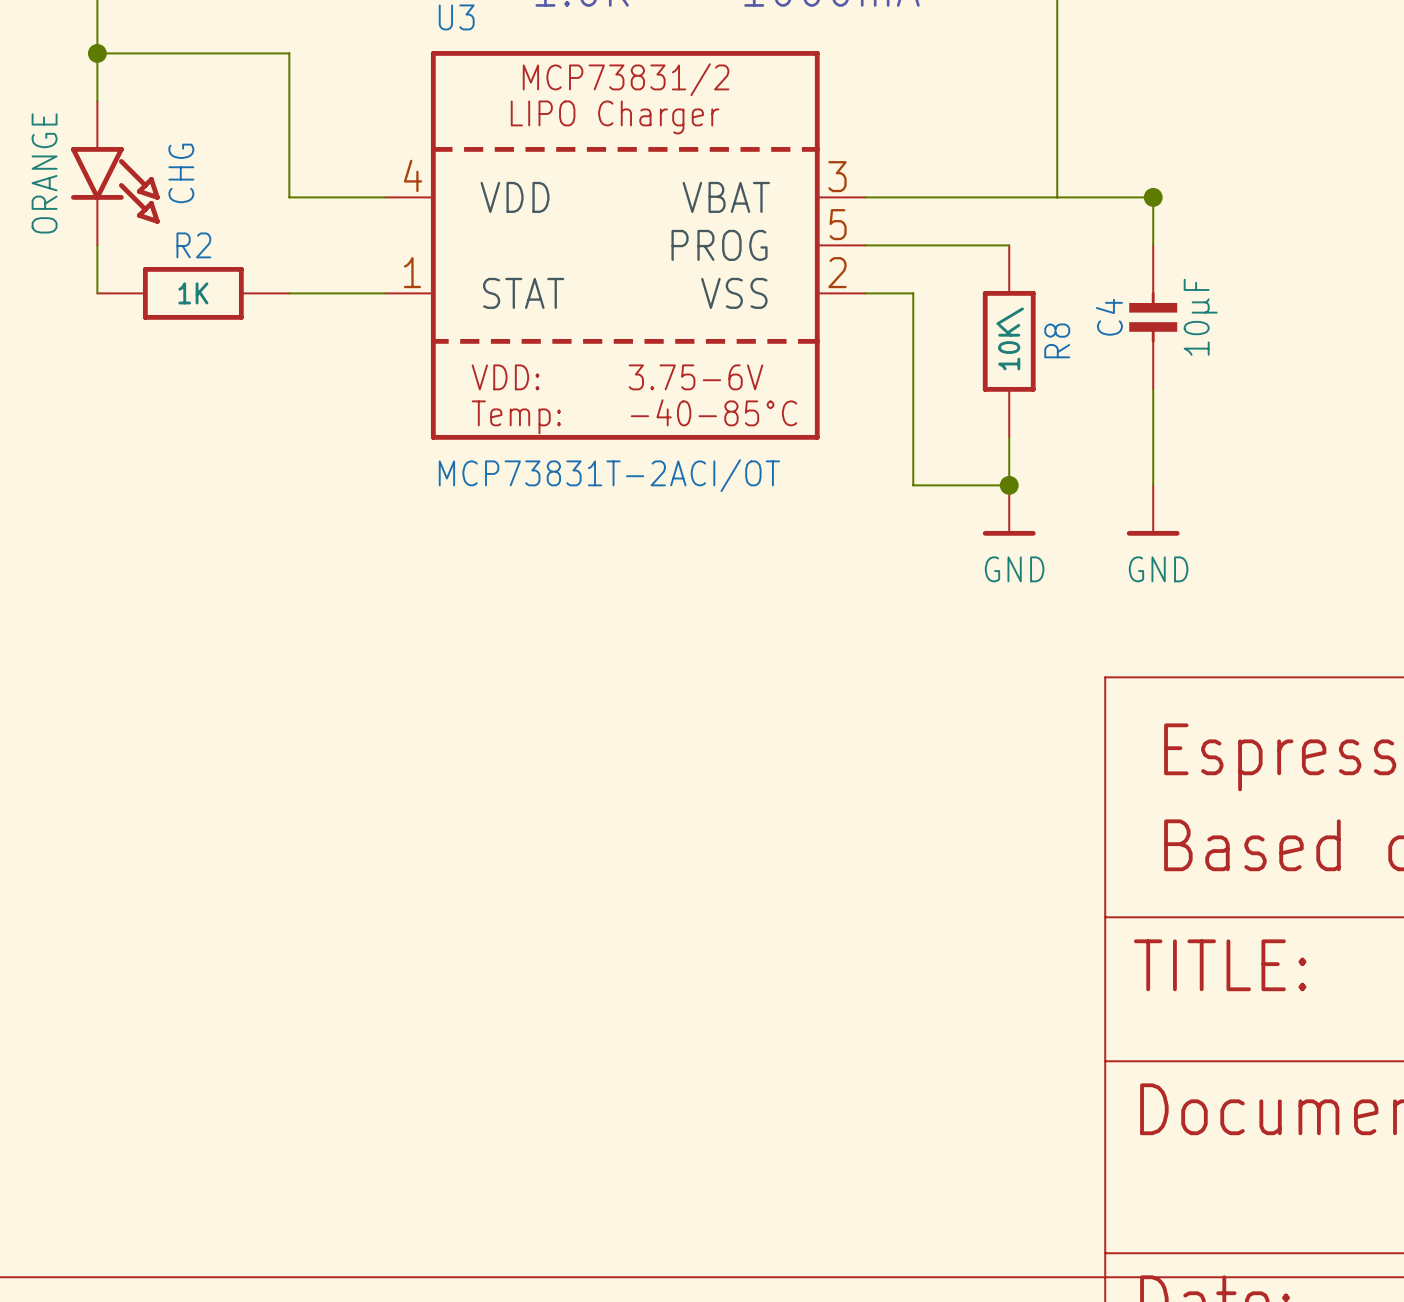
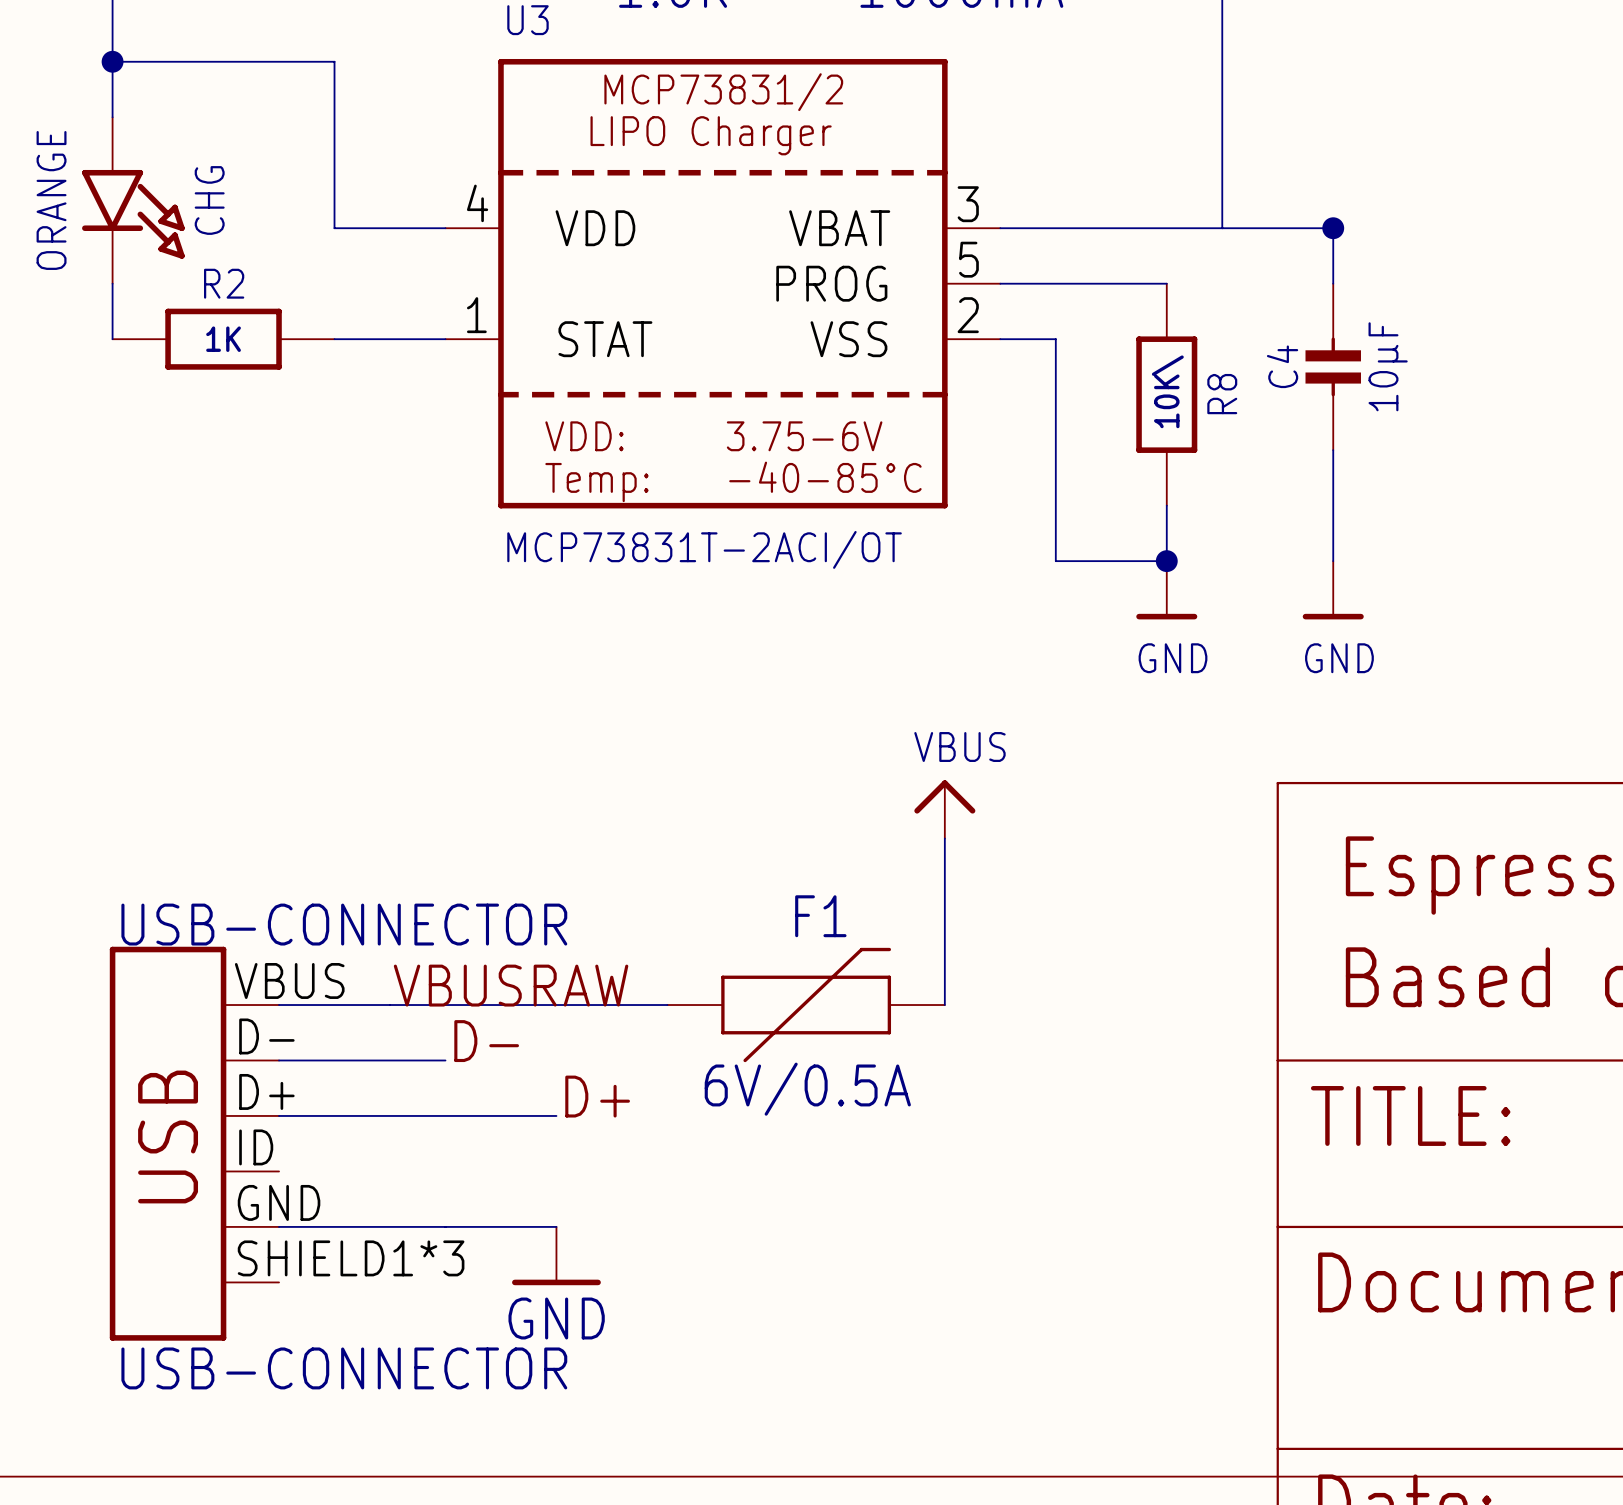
power symbol: none -> VBUS (944, 809)
wire: none -> (944, 838) (944, 1005)
label: none -> VBUSRAW (511, 985)
wire: none -> (279, 1005) (667, 1005)
F1: none -> 6V/0.5A (806, 1005)
label: none -> D- (486, 1041)
wire: none -> (279, 1060) (445, 1060)
label: none -> D+ (597, 1096)
wire: none -> (279, 1115) (556, 1115)
USB-CONNECTOR: none -> USB-CONNECTOR (194, 1143)
wire: none -> (279, 1226) (556, 1226)
power symbol: none -> GND (556, 1256)

